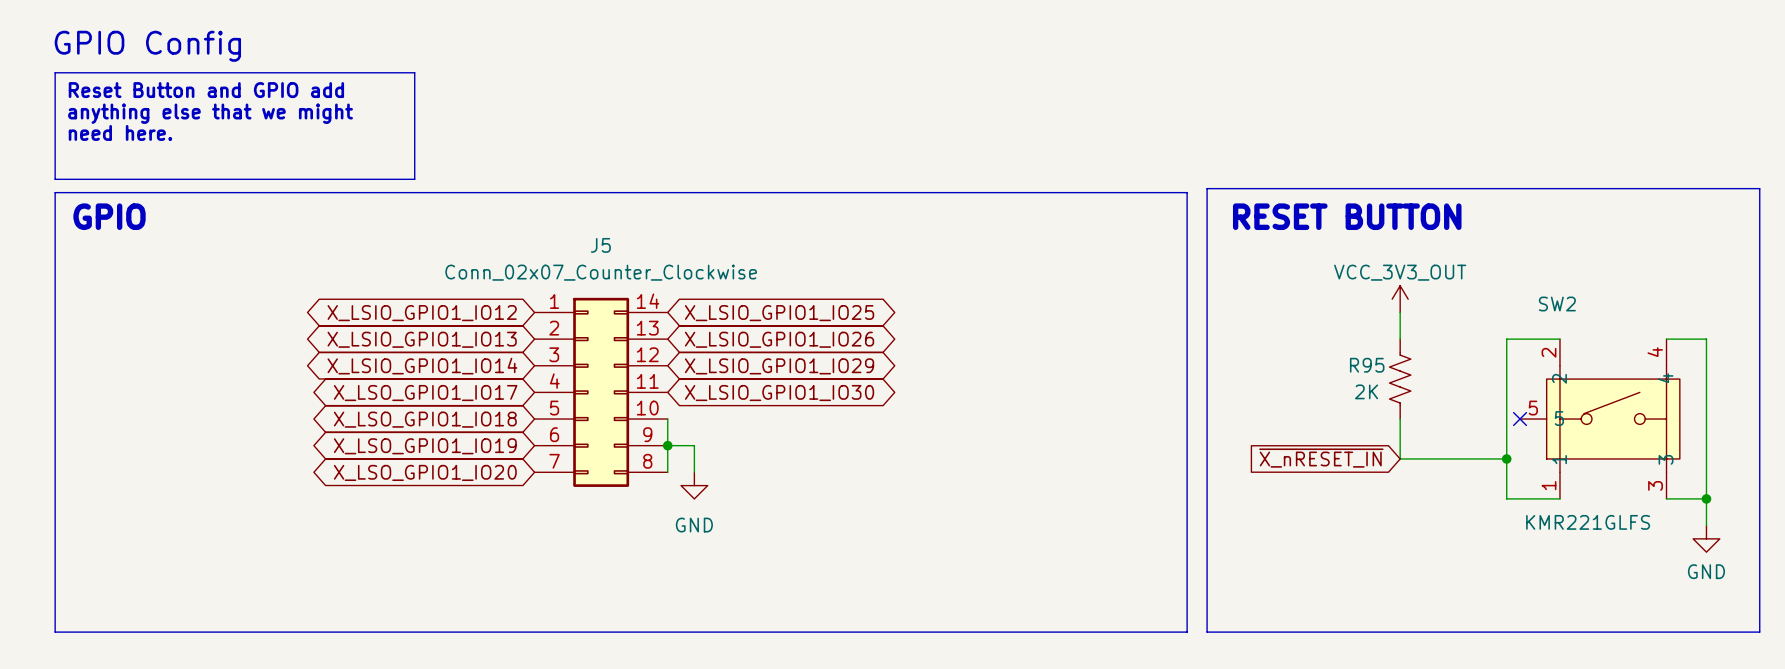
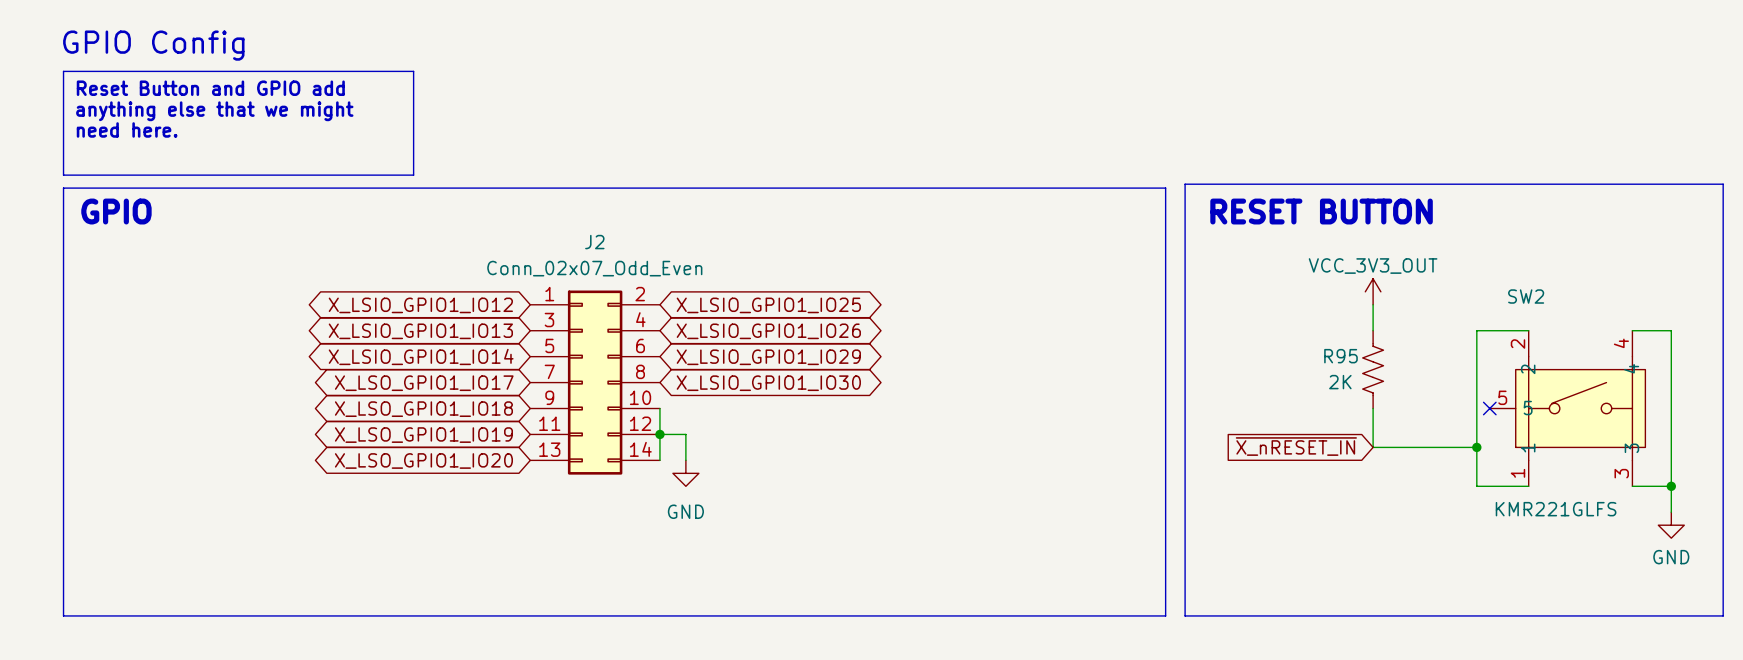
J5 name: J5 (600, 245) -> J2 (594, 242)
J5 value: Conn_02x07_Counter_Clockwise (601, 272) -> Conn_02x07_Odd_Even (594, 268)
J5 symbol: [534, 297, 668, 487] -> [530, 290, 660, 475]

